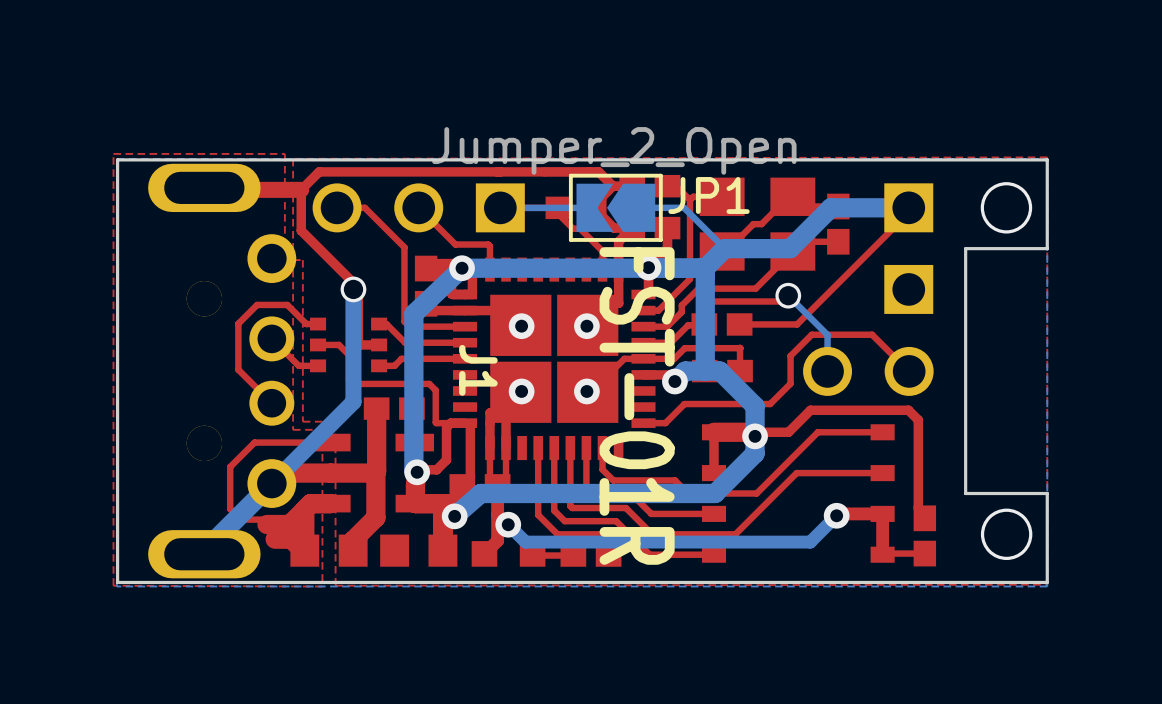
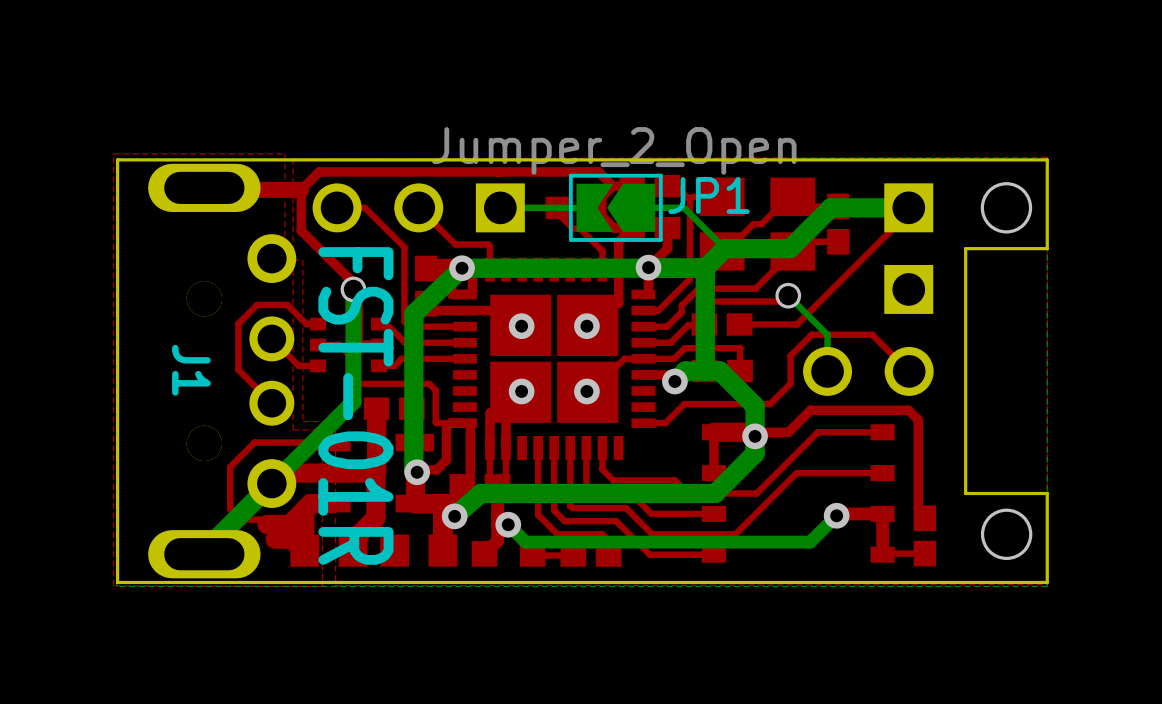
text position: J1 (478, 370) -> J1 (191, 370)
text position: FST-01R (637, 405) -> FST-01R (355, 405)

